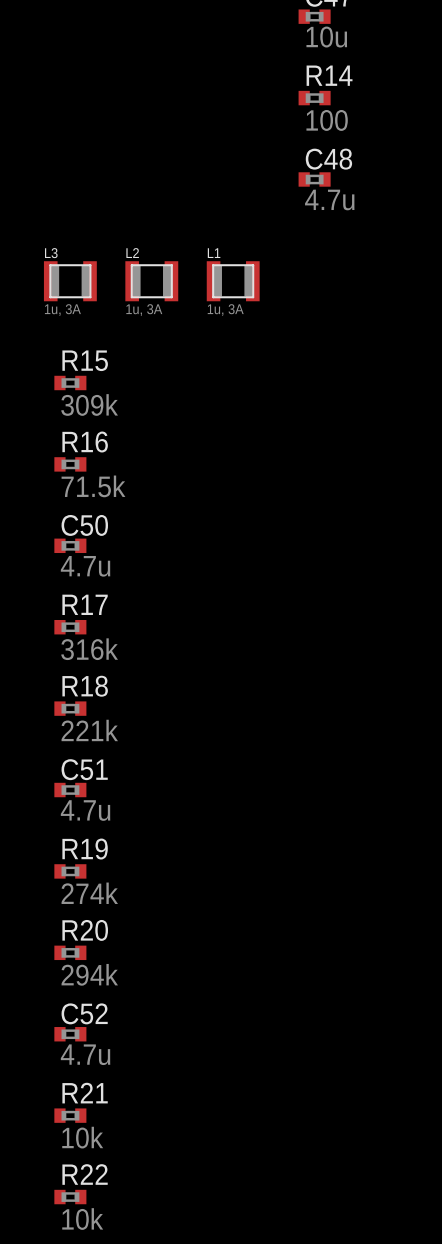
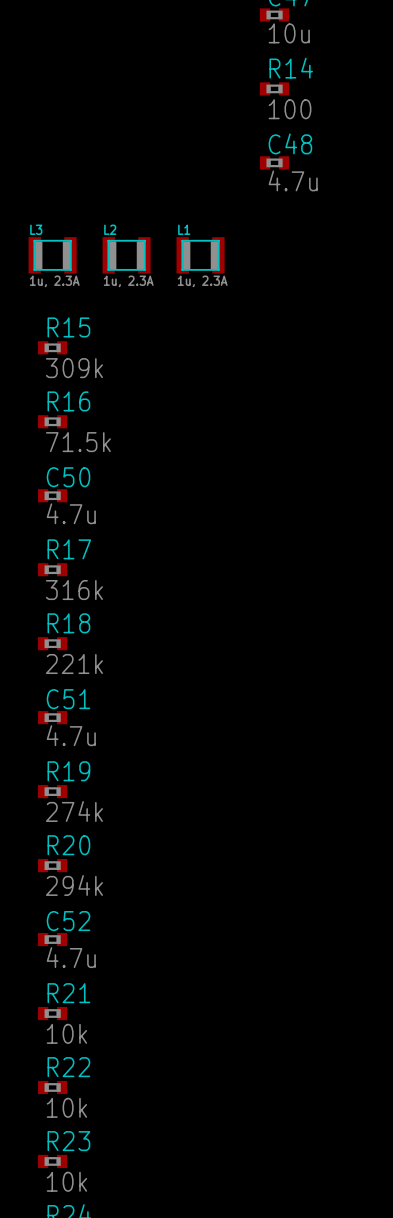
L3 value: 1u, 3A (62, 310) -> 1u, 2.3A (54, 281)
L2 value: 1u, 3A (144, 310) -> 1u, 2.3A (128, 281)
L1 value: 1u, 3A (225, 310) -> 1u, 2.3A (202, 281)

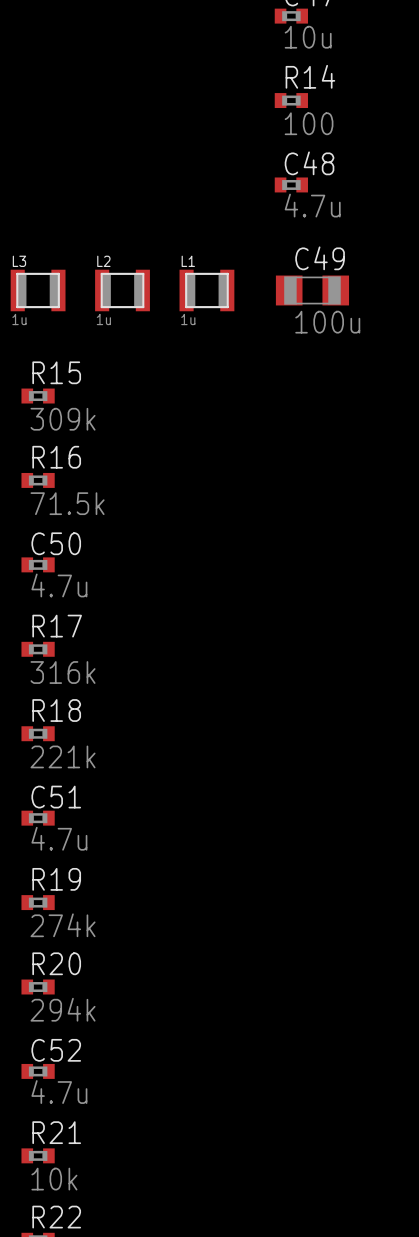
C49: none -> 100u (312, 290)
L3 value: 1u, 2.3A (54, 281) -> 1u (19, 319)
L2 value: 1u, 2.3A (128, 281) -> 1u (103, 319)
L1 value: 1u, 2.3A (202, 281) -> 1u (188, 319)

